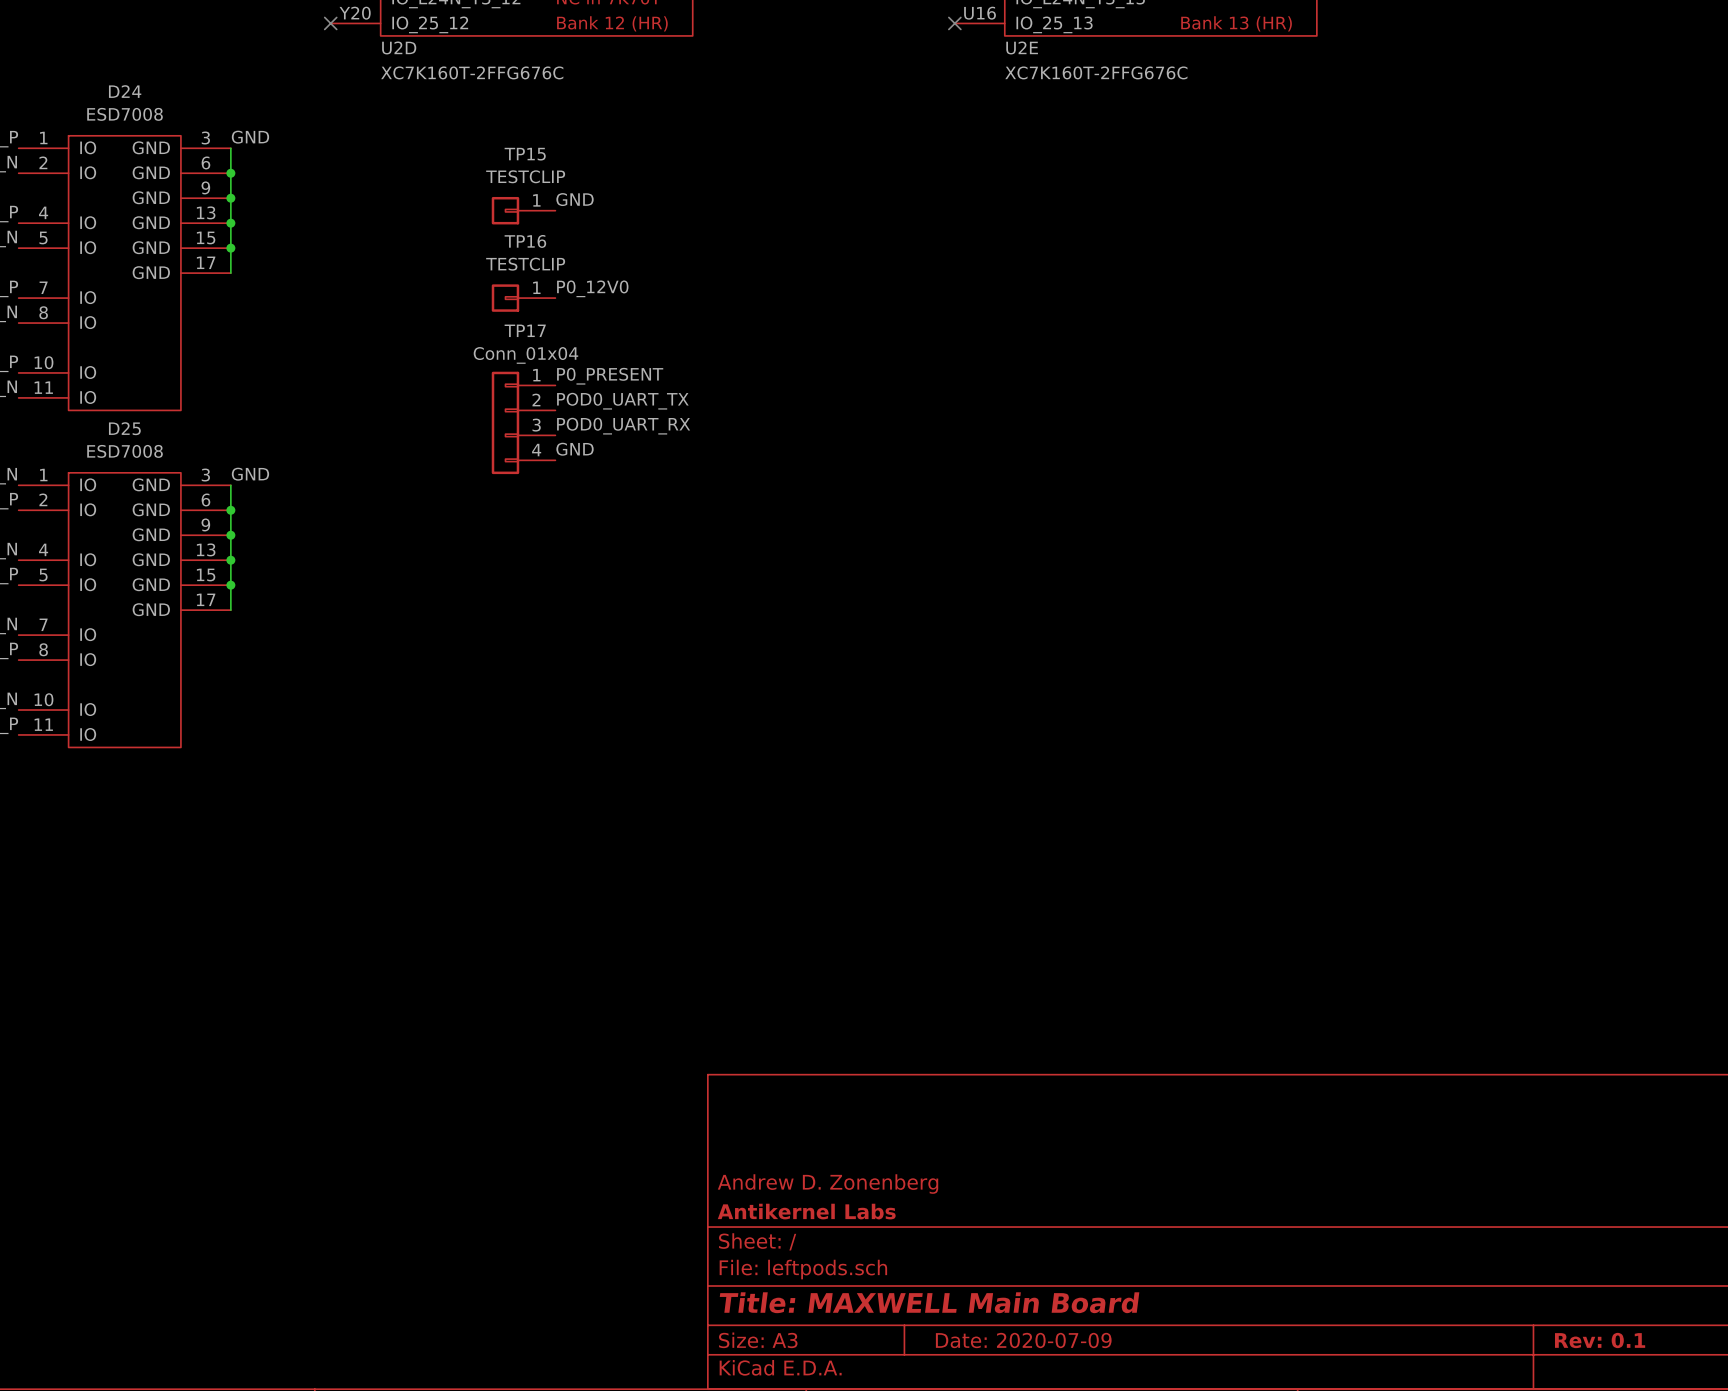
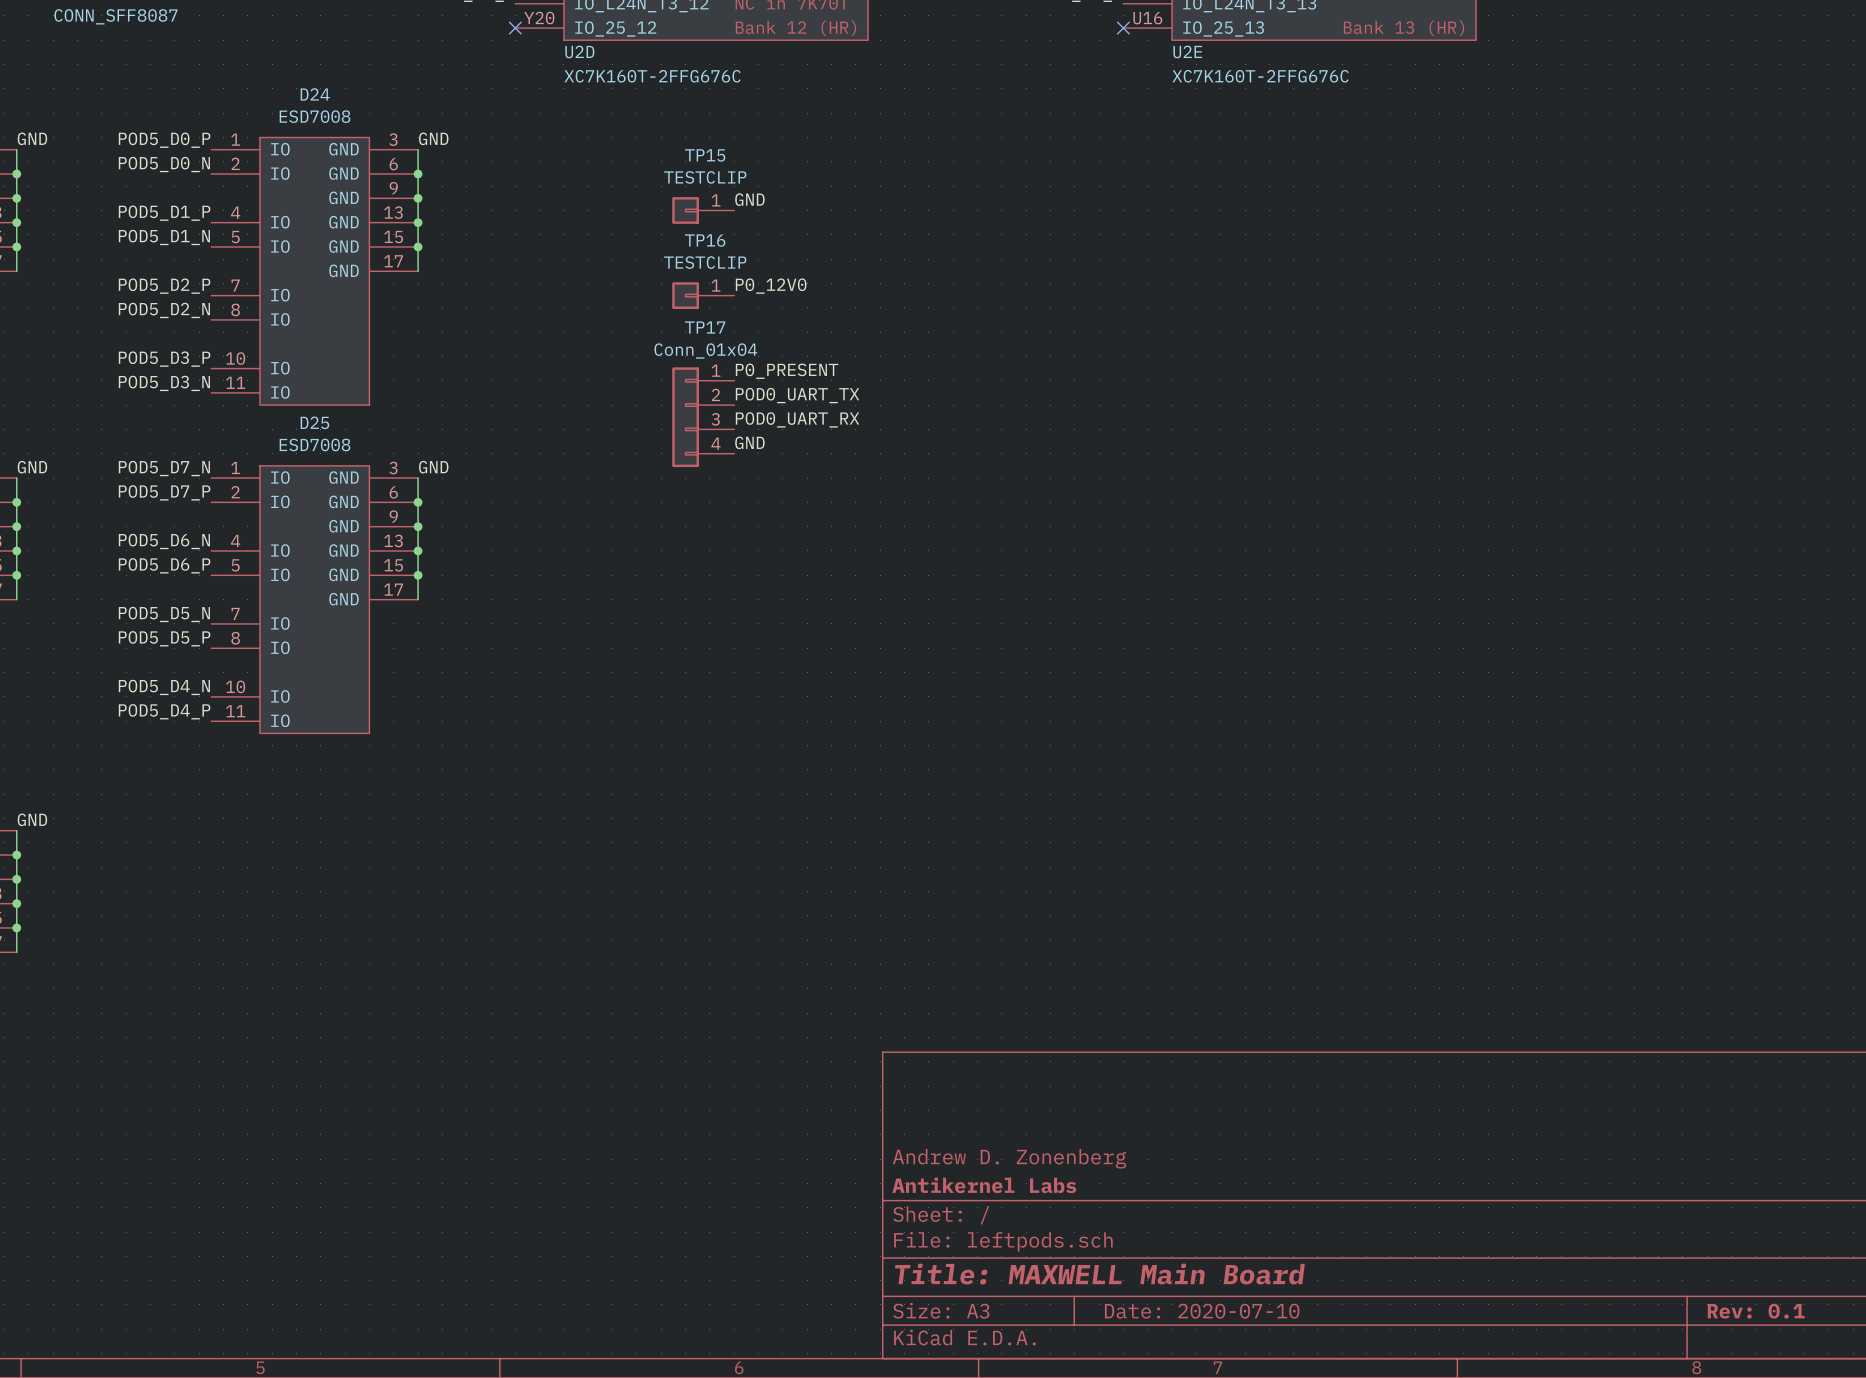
title block: Date: 2020-07-09 (1023, 1340) -> Date: 2020-07-10 (1202, 1311)

